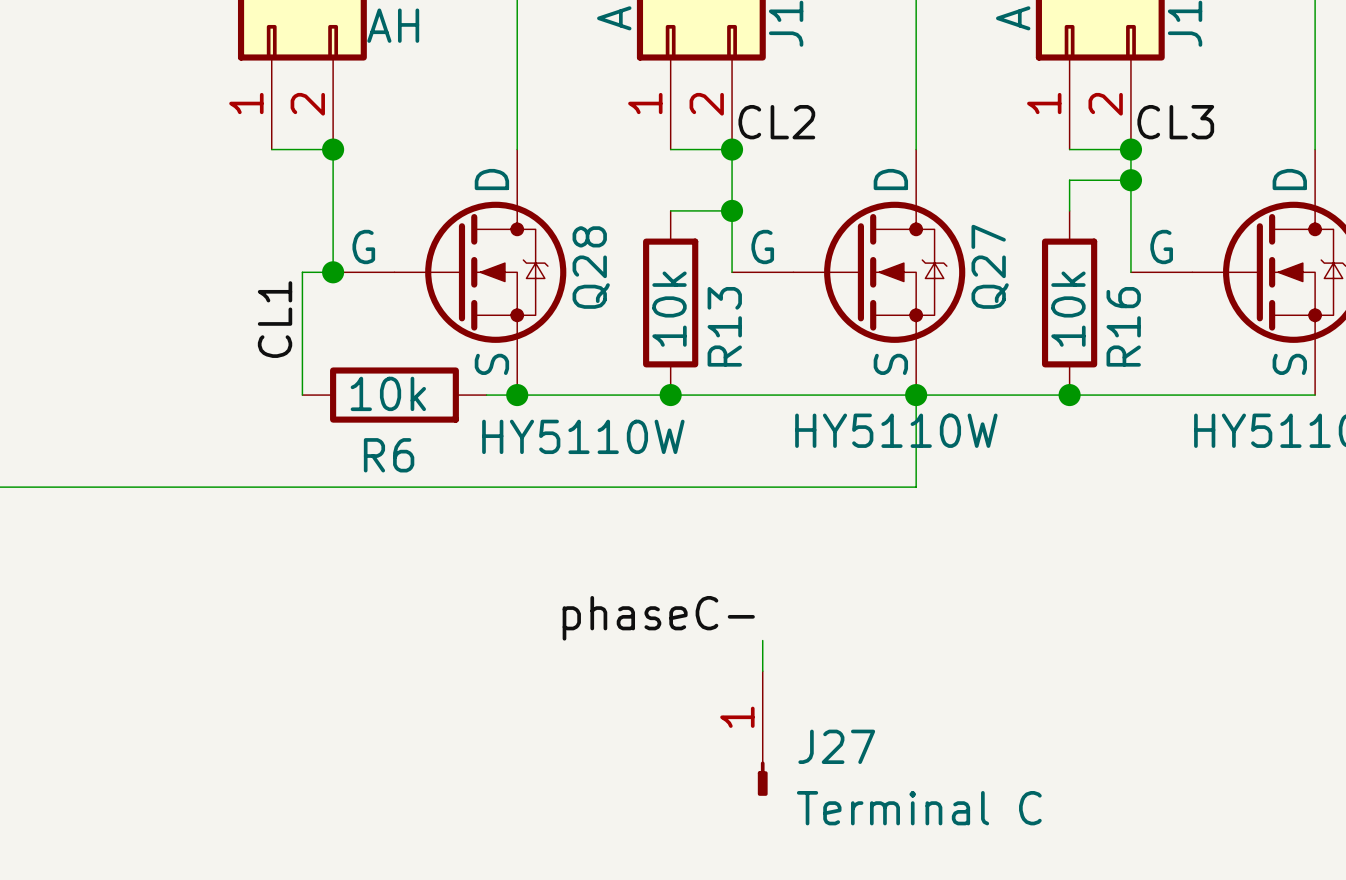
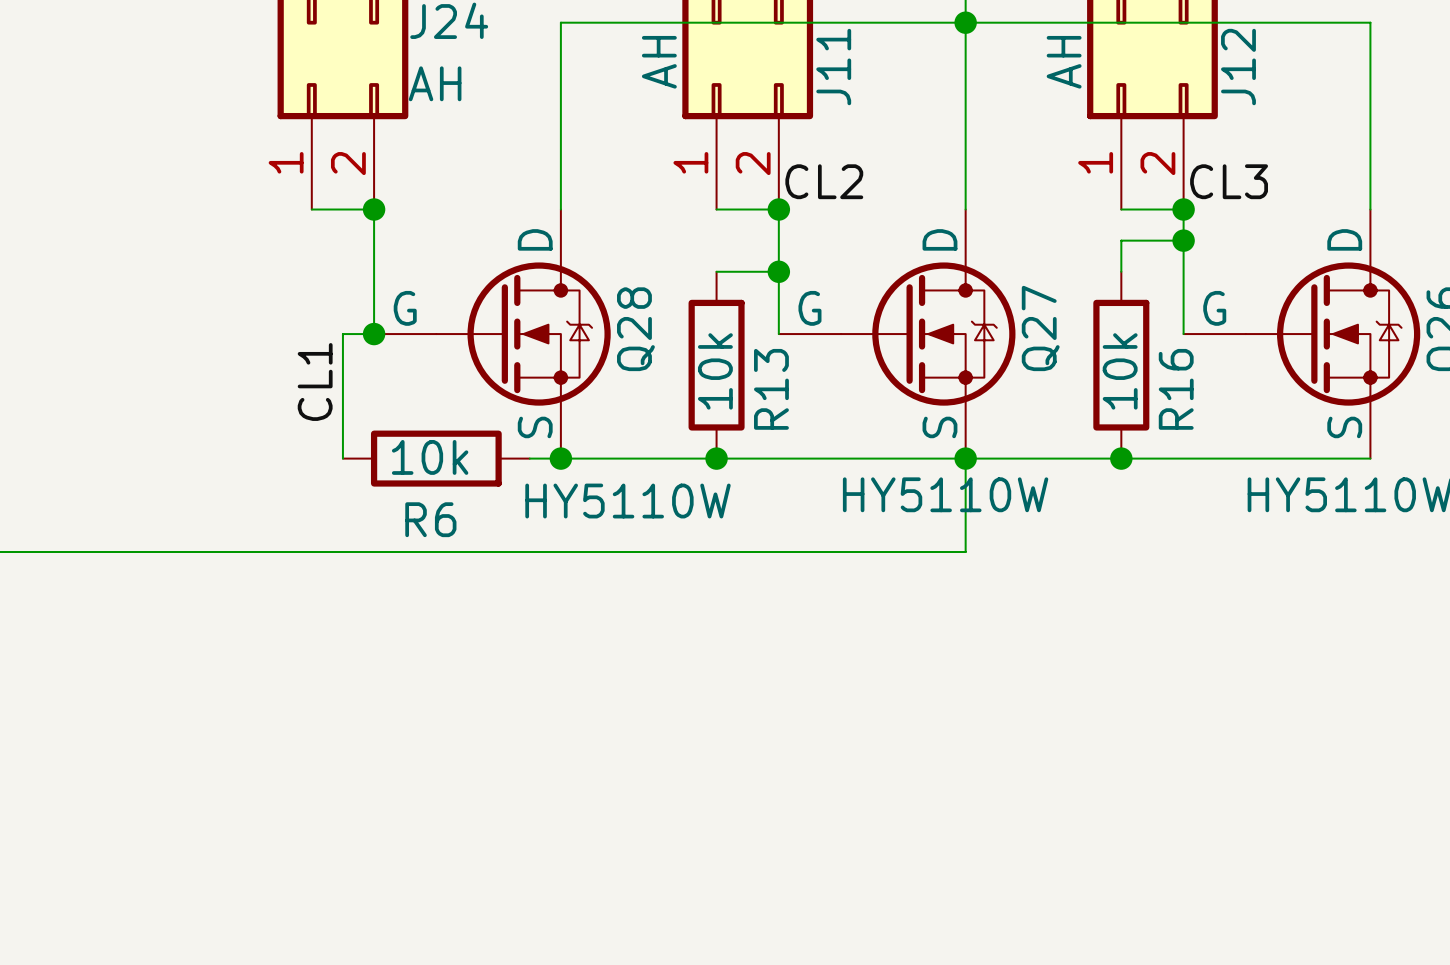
label: phaseC- (658, 618) -> none
wire: (762, 640) (762, 671) -> none
J27: Terminal C (762, 733) -> none

